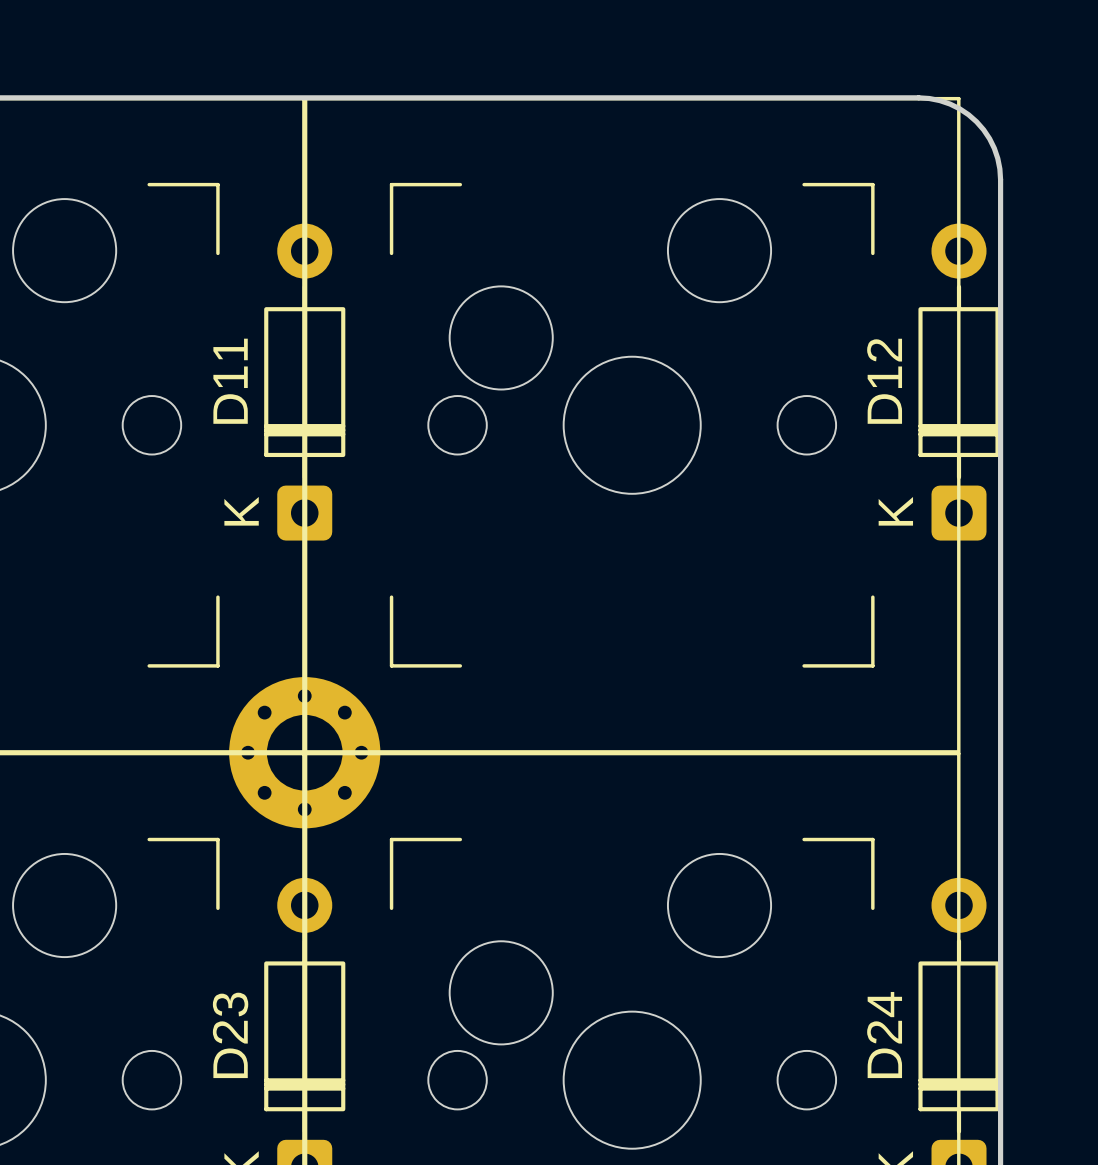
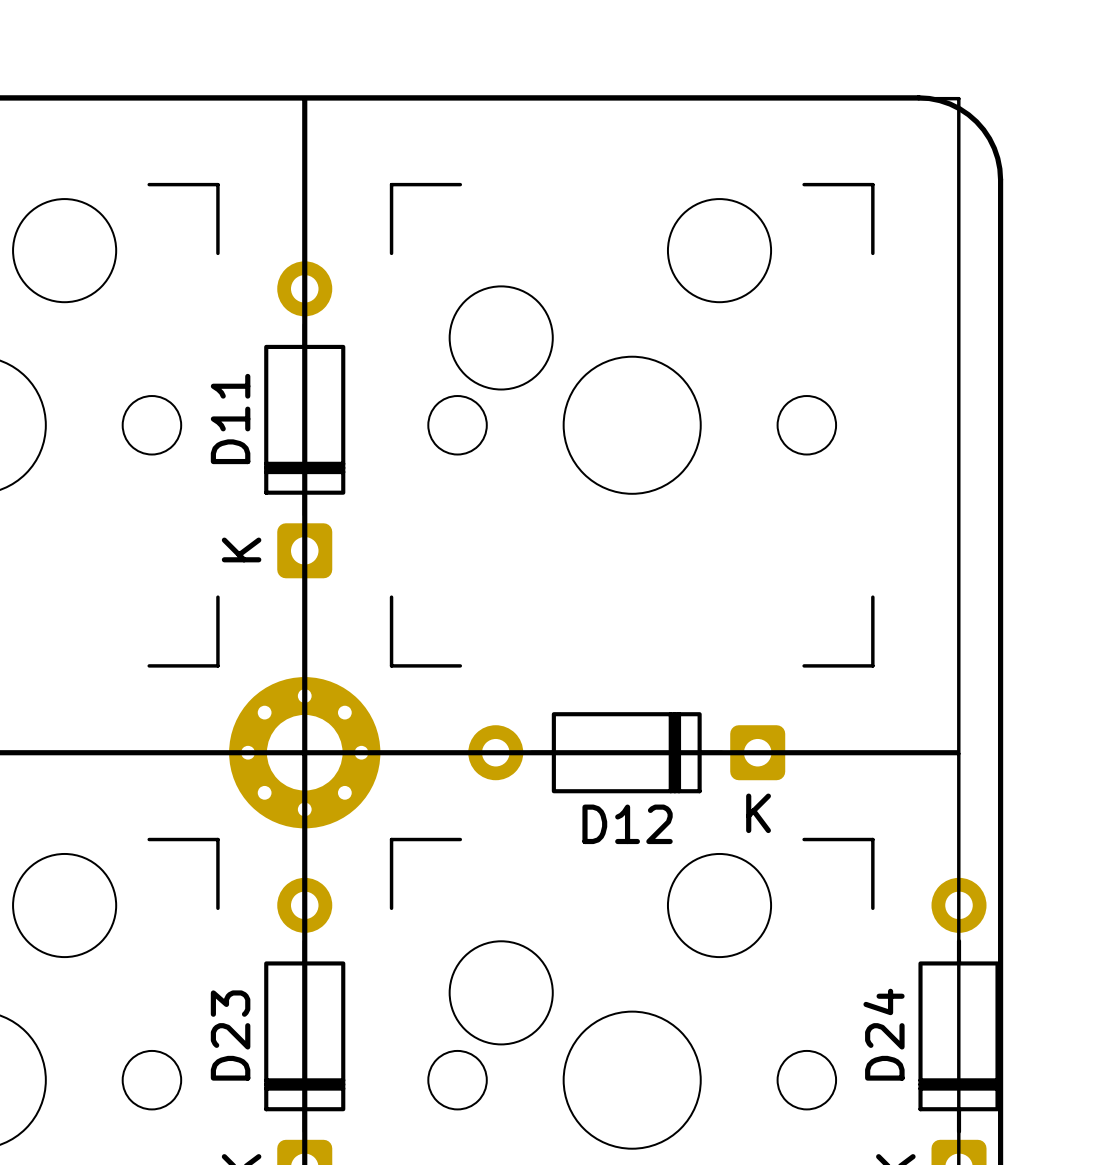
D11 position: (304, 382) -> (304, 419)
D12 rotation: 0° (959, 382) -> 90° counterclockwise (626, 752)
D12 position: (959, 382) -> (626, 752)

